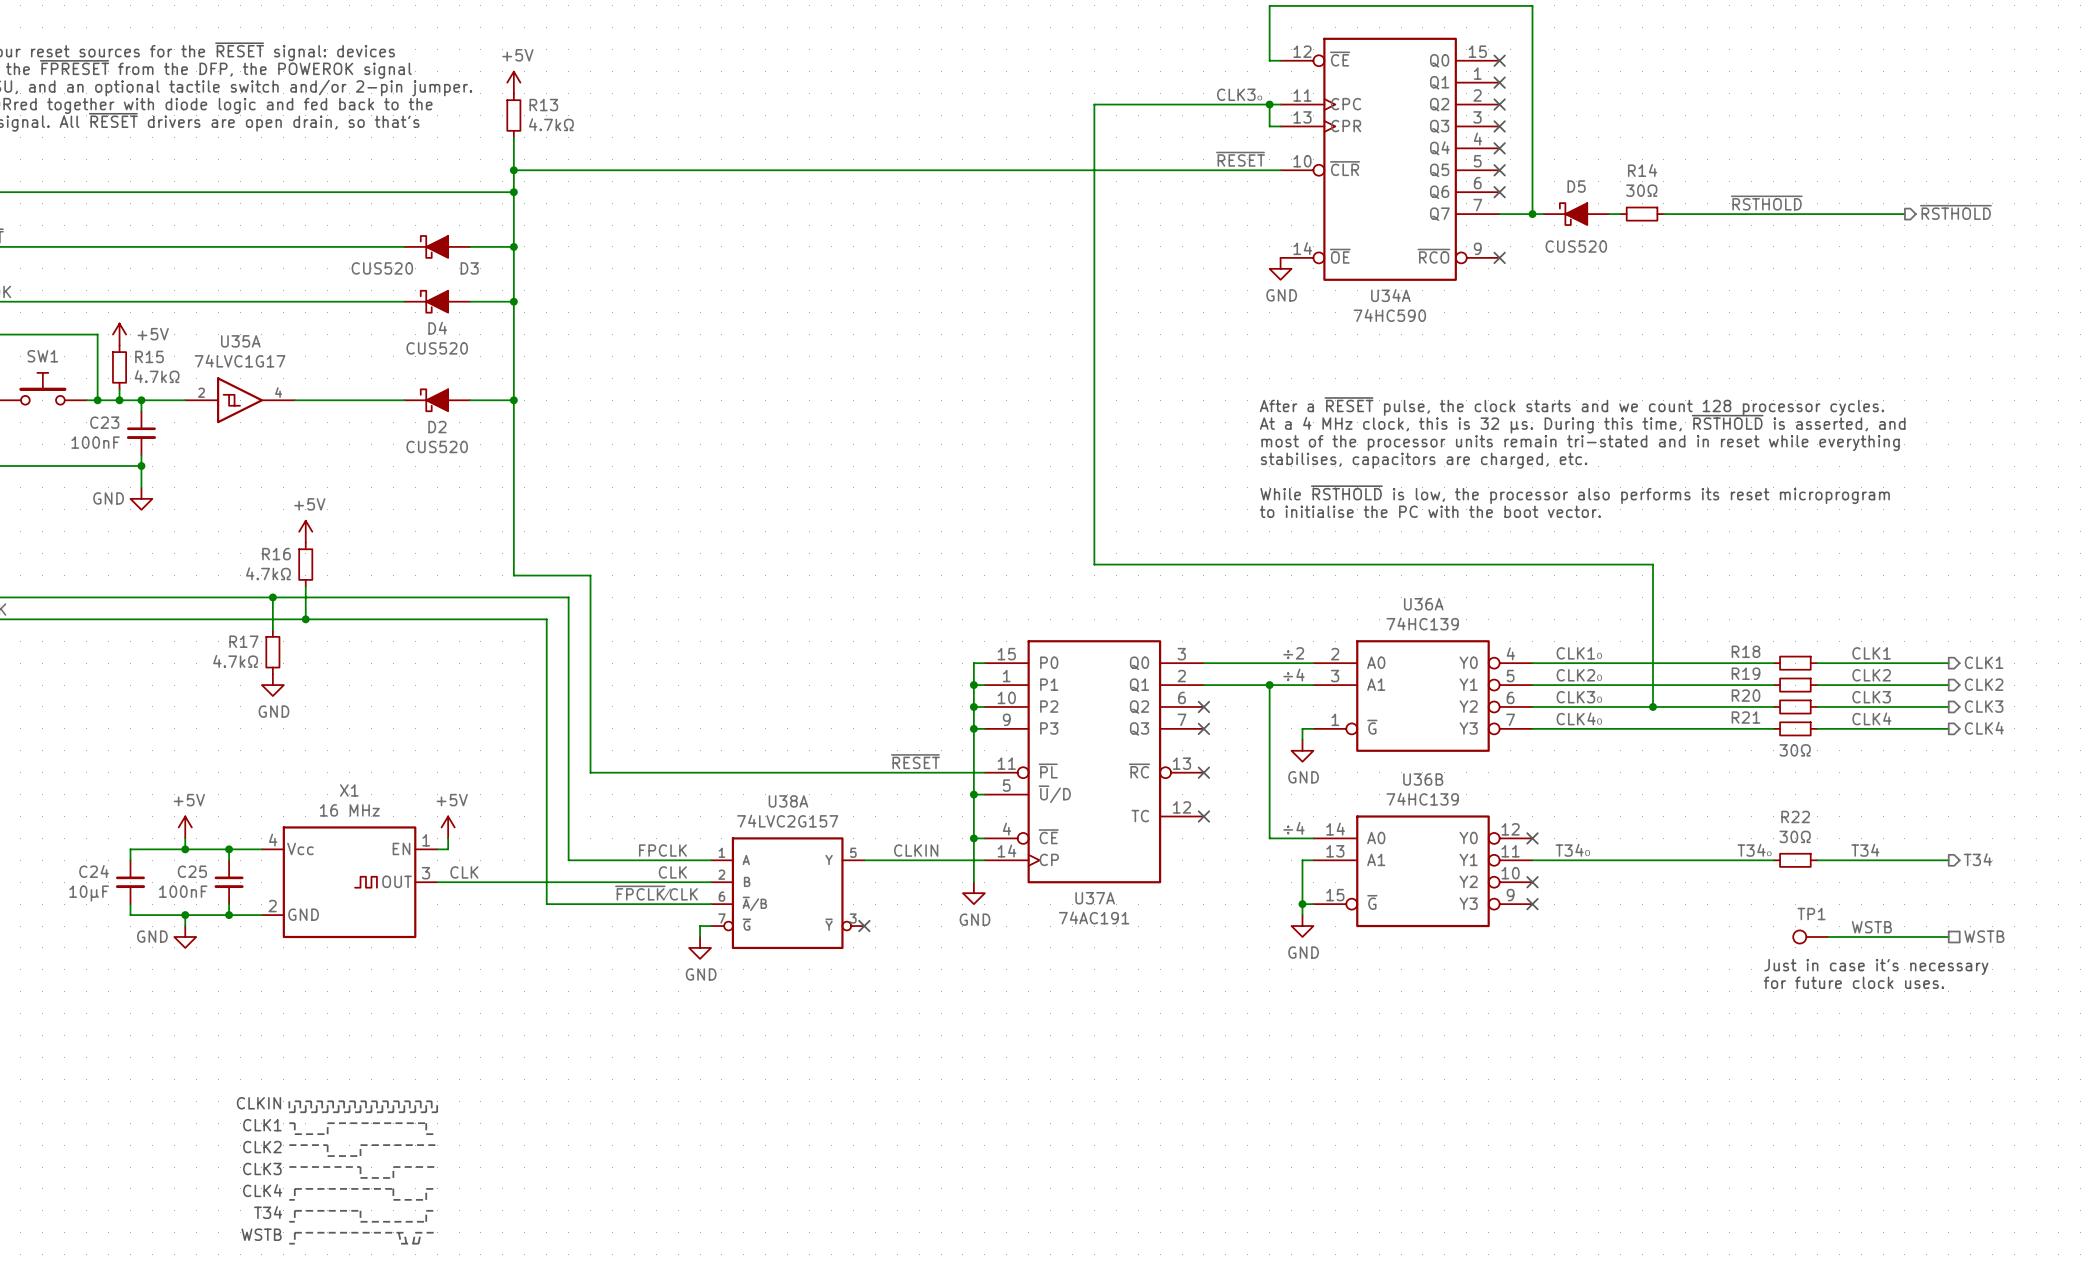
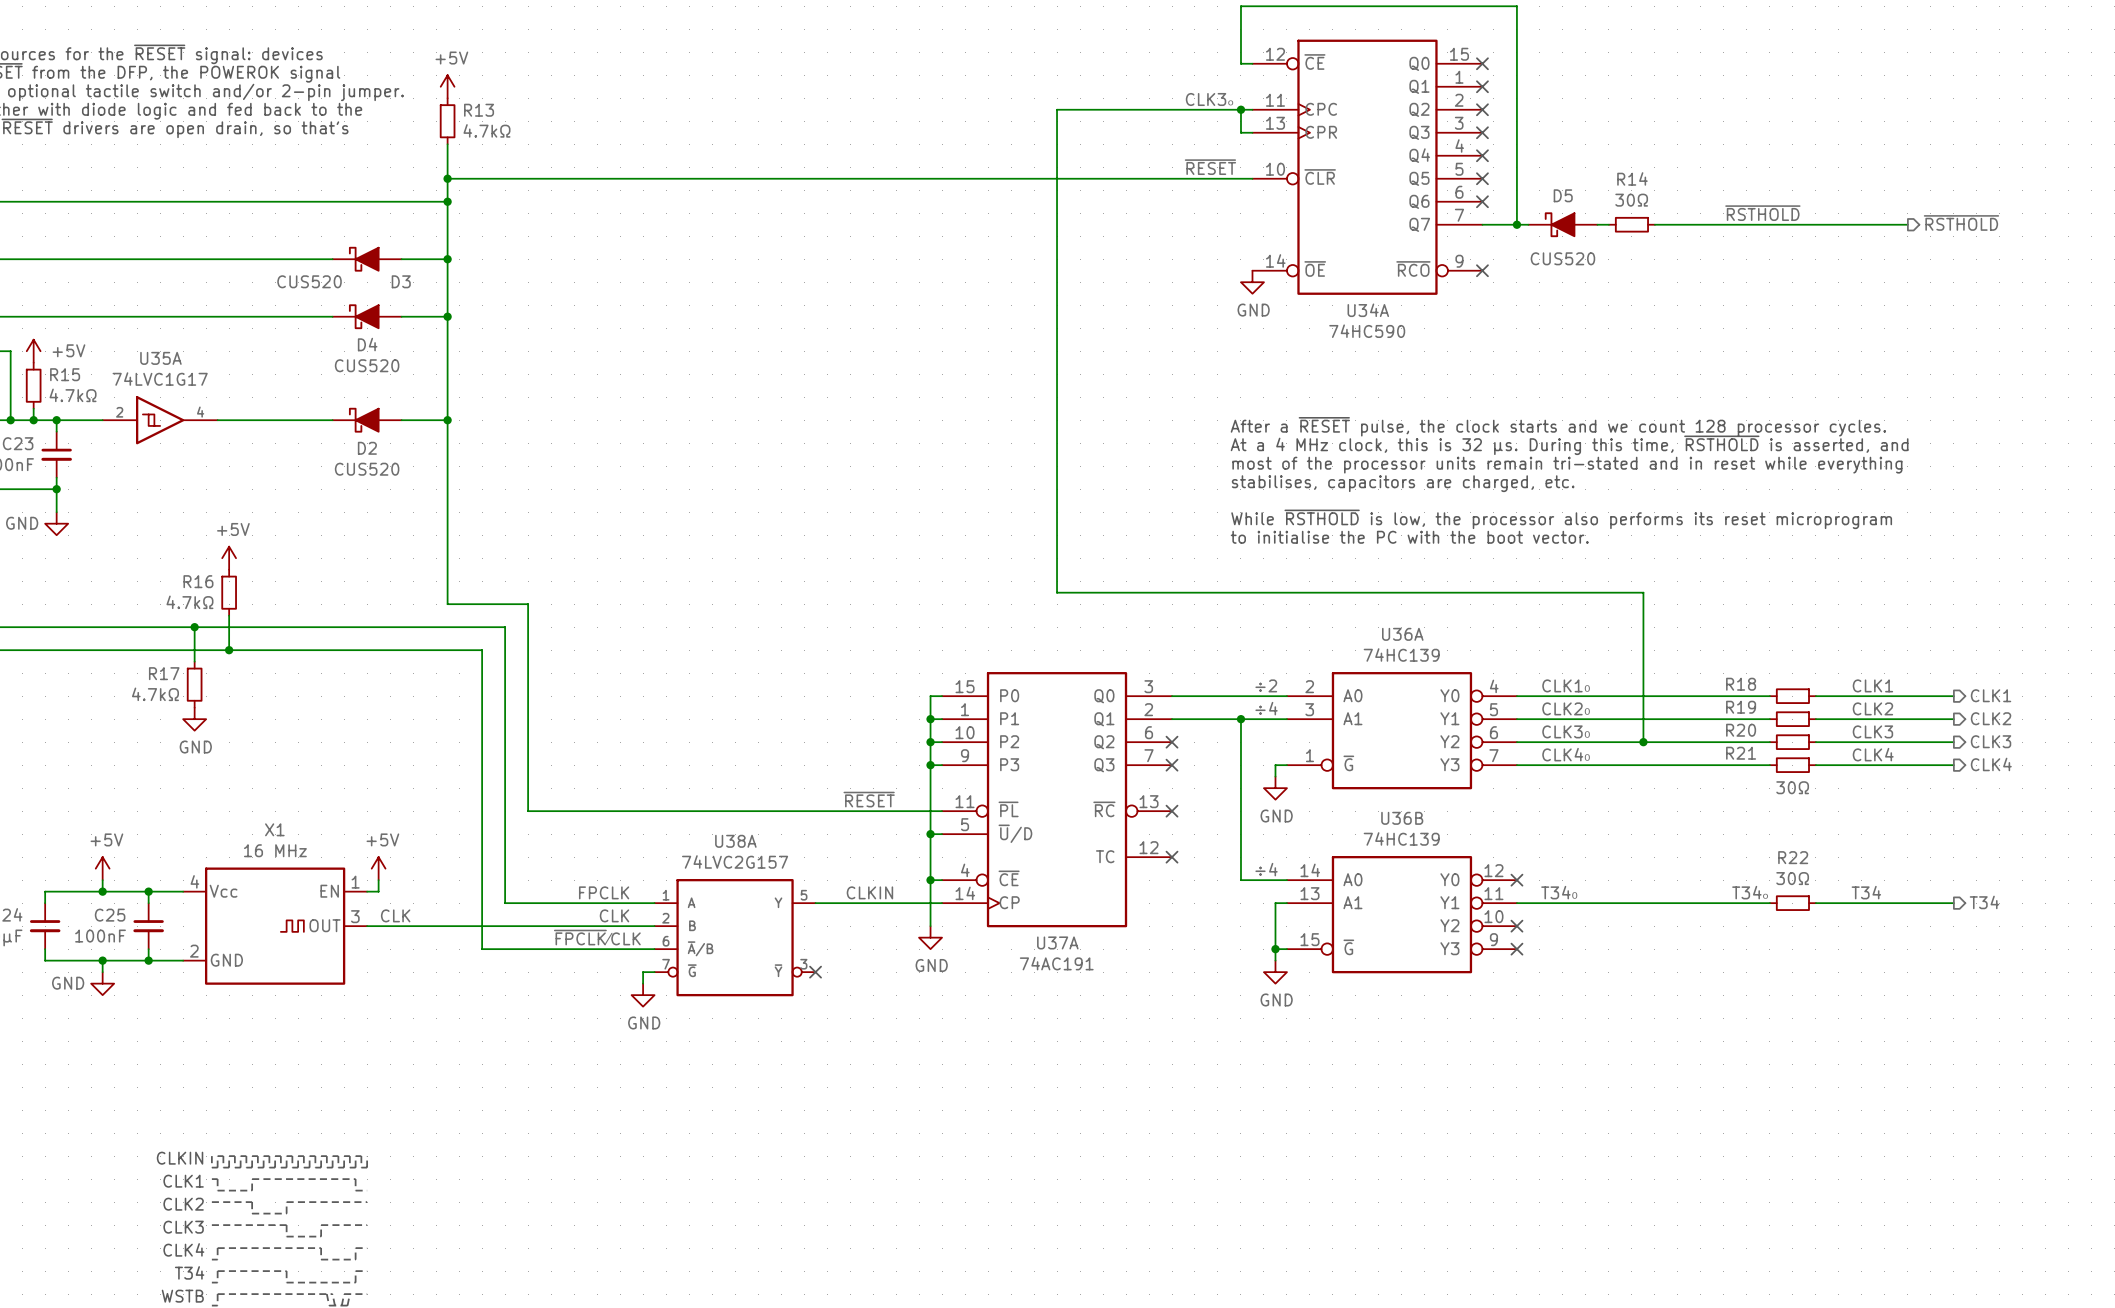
label: WSTB (1871, 927) -> none
TP1: (1810, 936) -> none
wire: (1828, 936) (1948, 936) -> none
hierarchical label: WSTB (1984, 936) -> none
text: Just in case it's necessary (1876, 966) -> none
text: for future clock uses. (1853, 982) -> none

